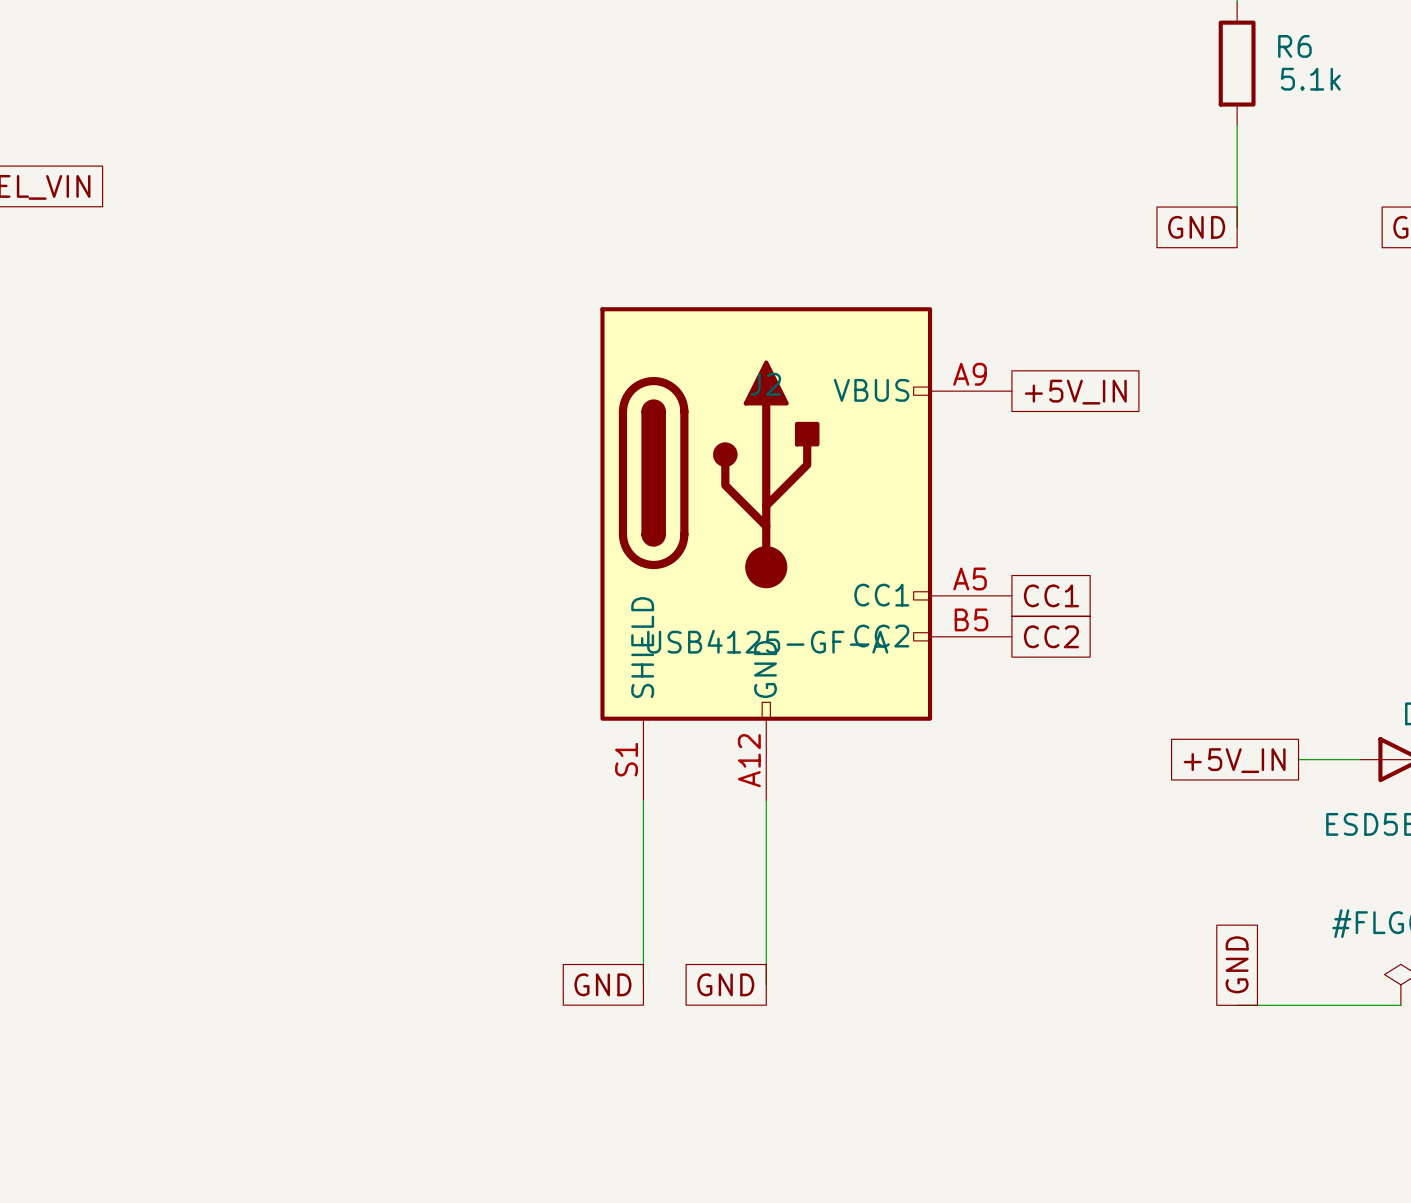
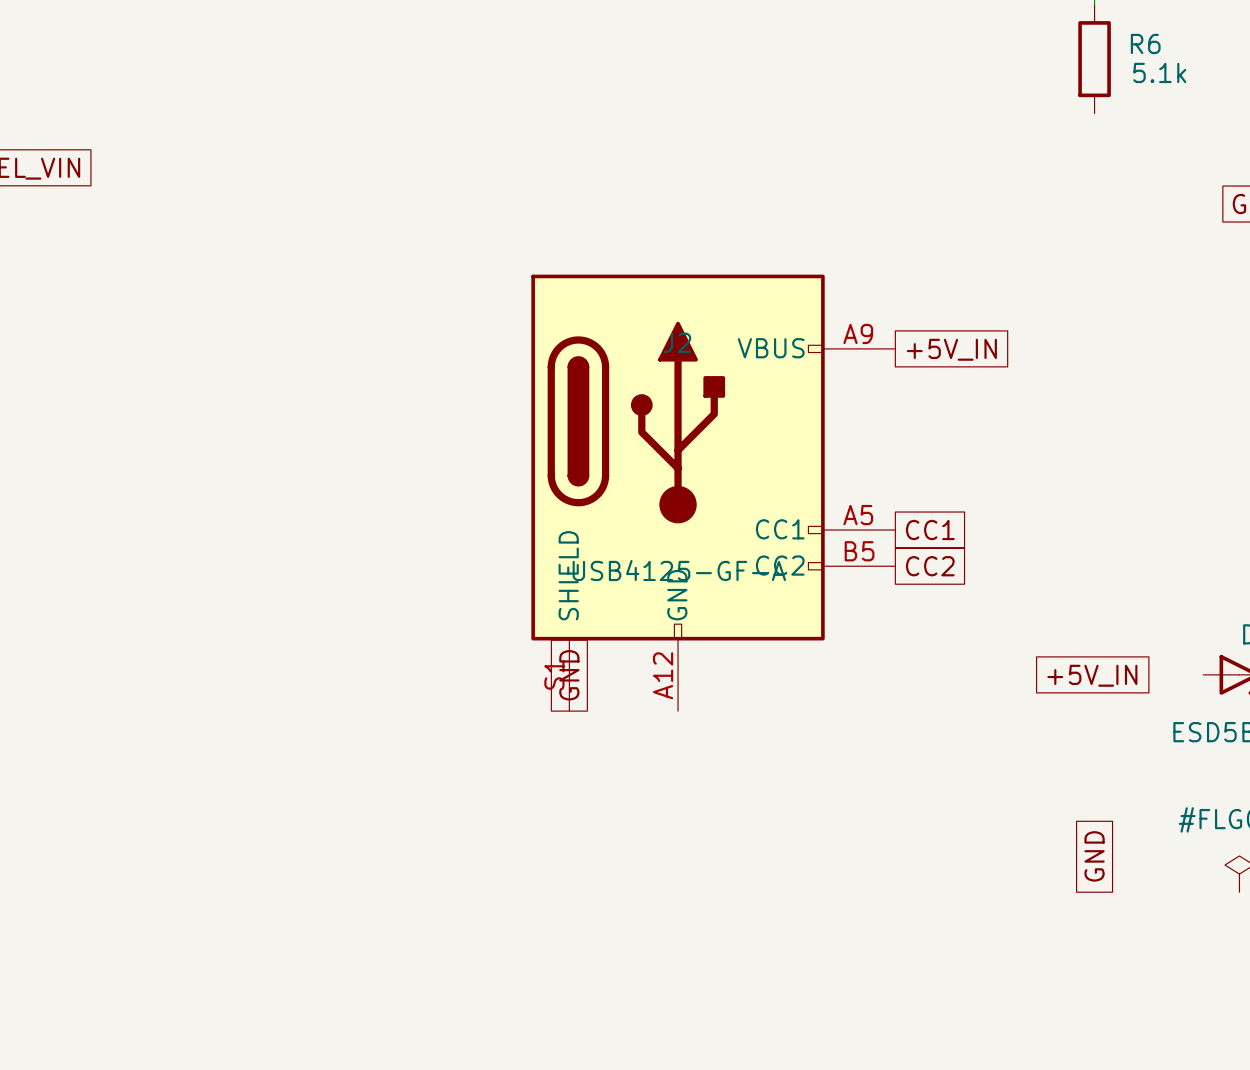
wire: (1237, 125) (1237, 227) -> none
global label: GND (1196, 227) -> none
wire: (1298, 759) (1359, 759) -> none
global label: none -> GND (569, 675)
wire: (643, 800) (643, 984) -> none
wire: (766, 800) (766, 984) -> none
global label: GND (602, 984) -> none
global label: GND (725, 984) -> none
wire: (1237, 1005) (1400, 1005) -> none

